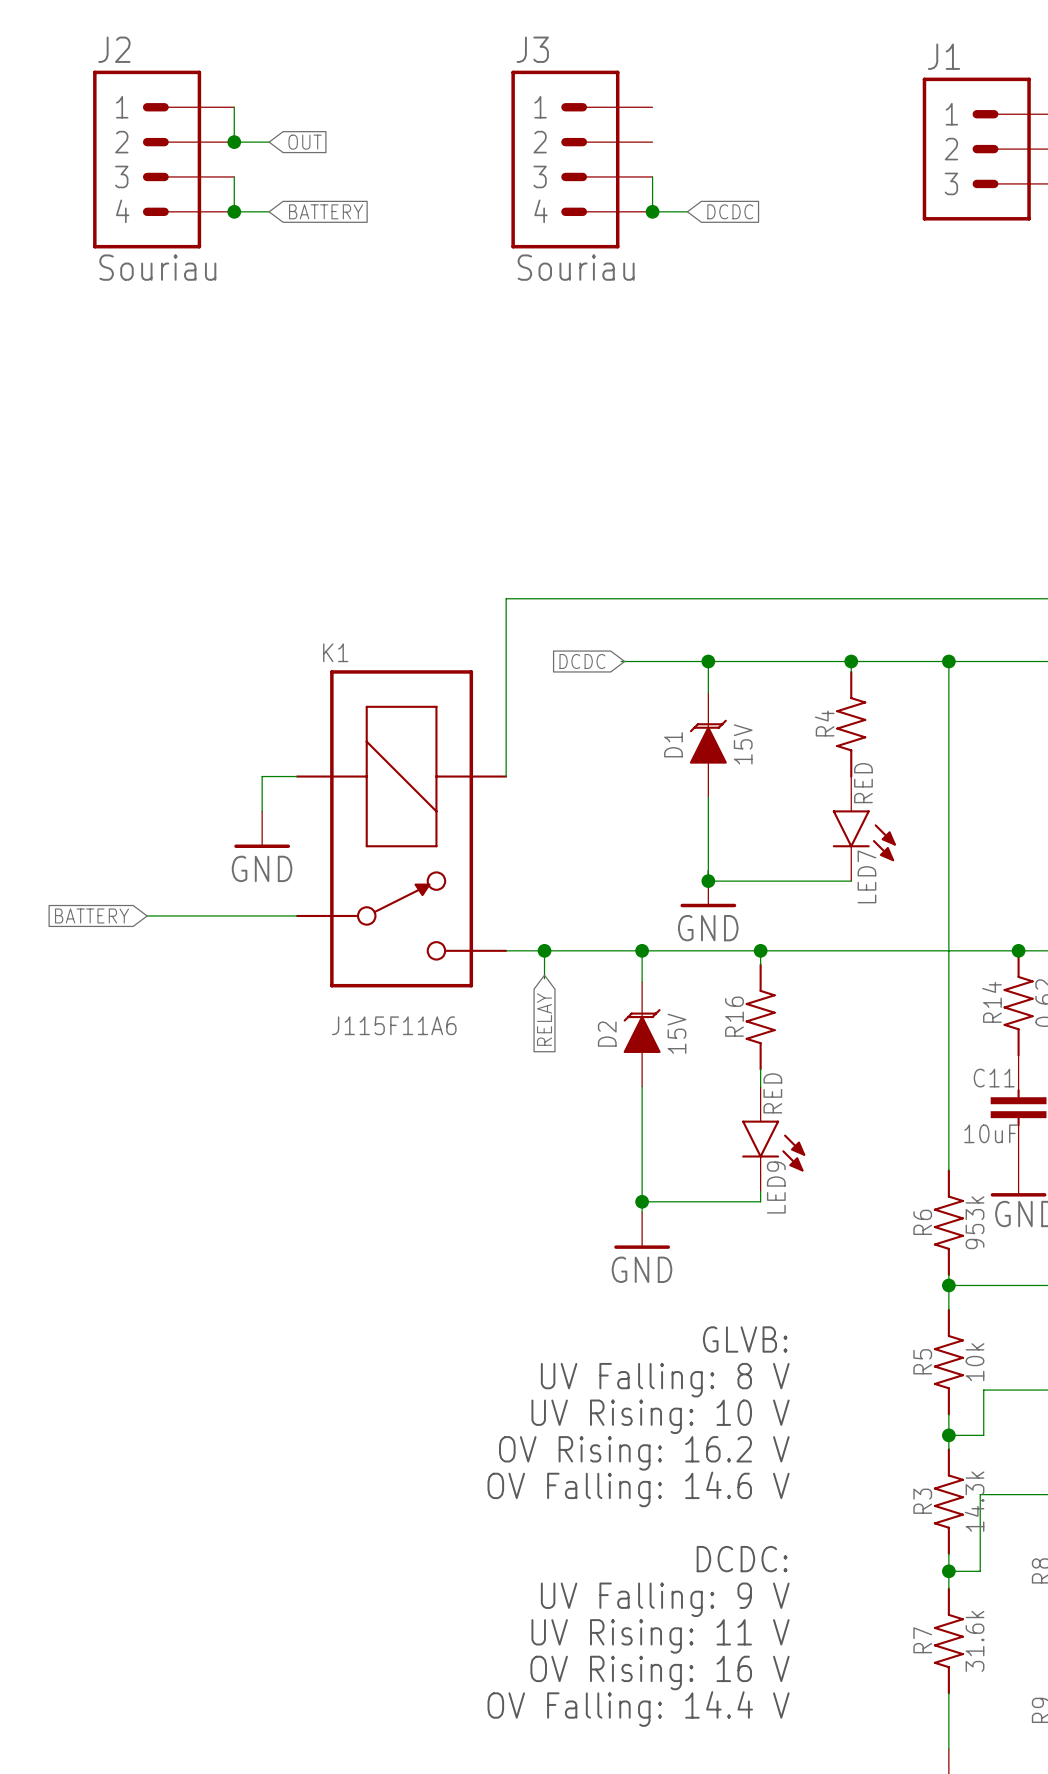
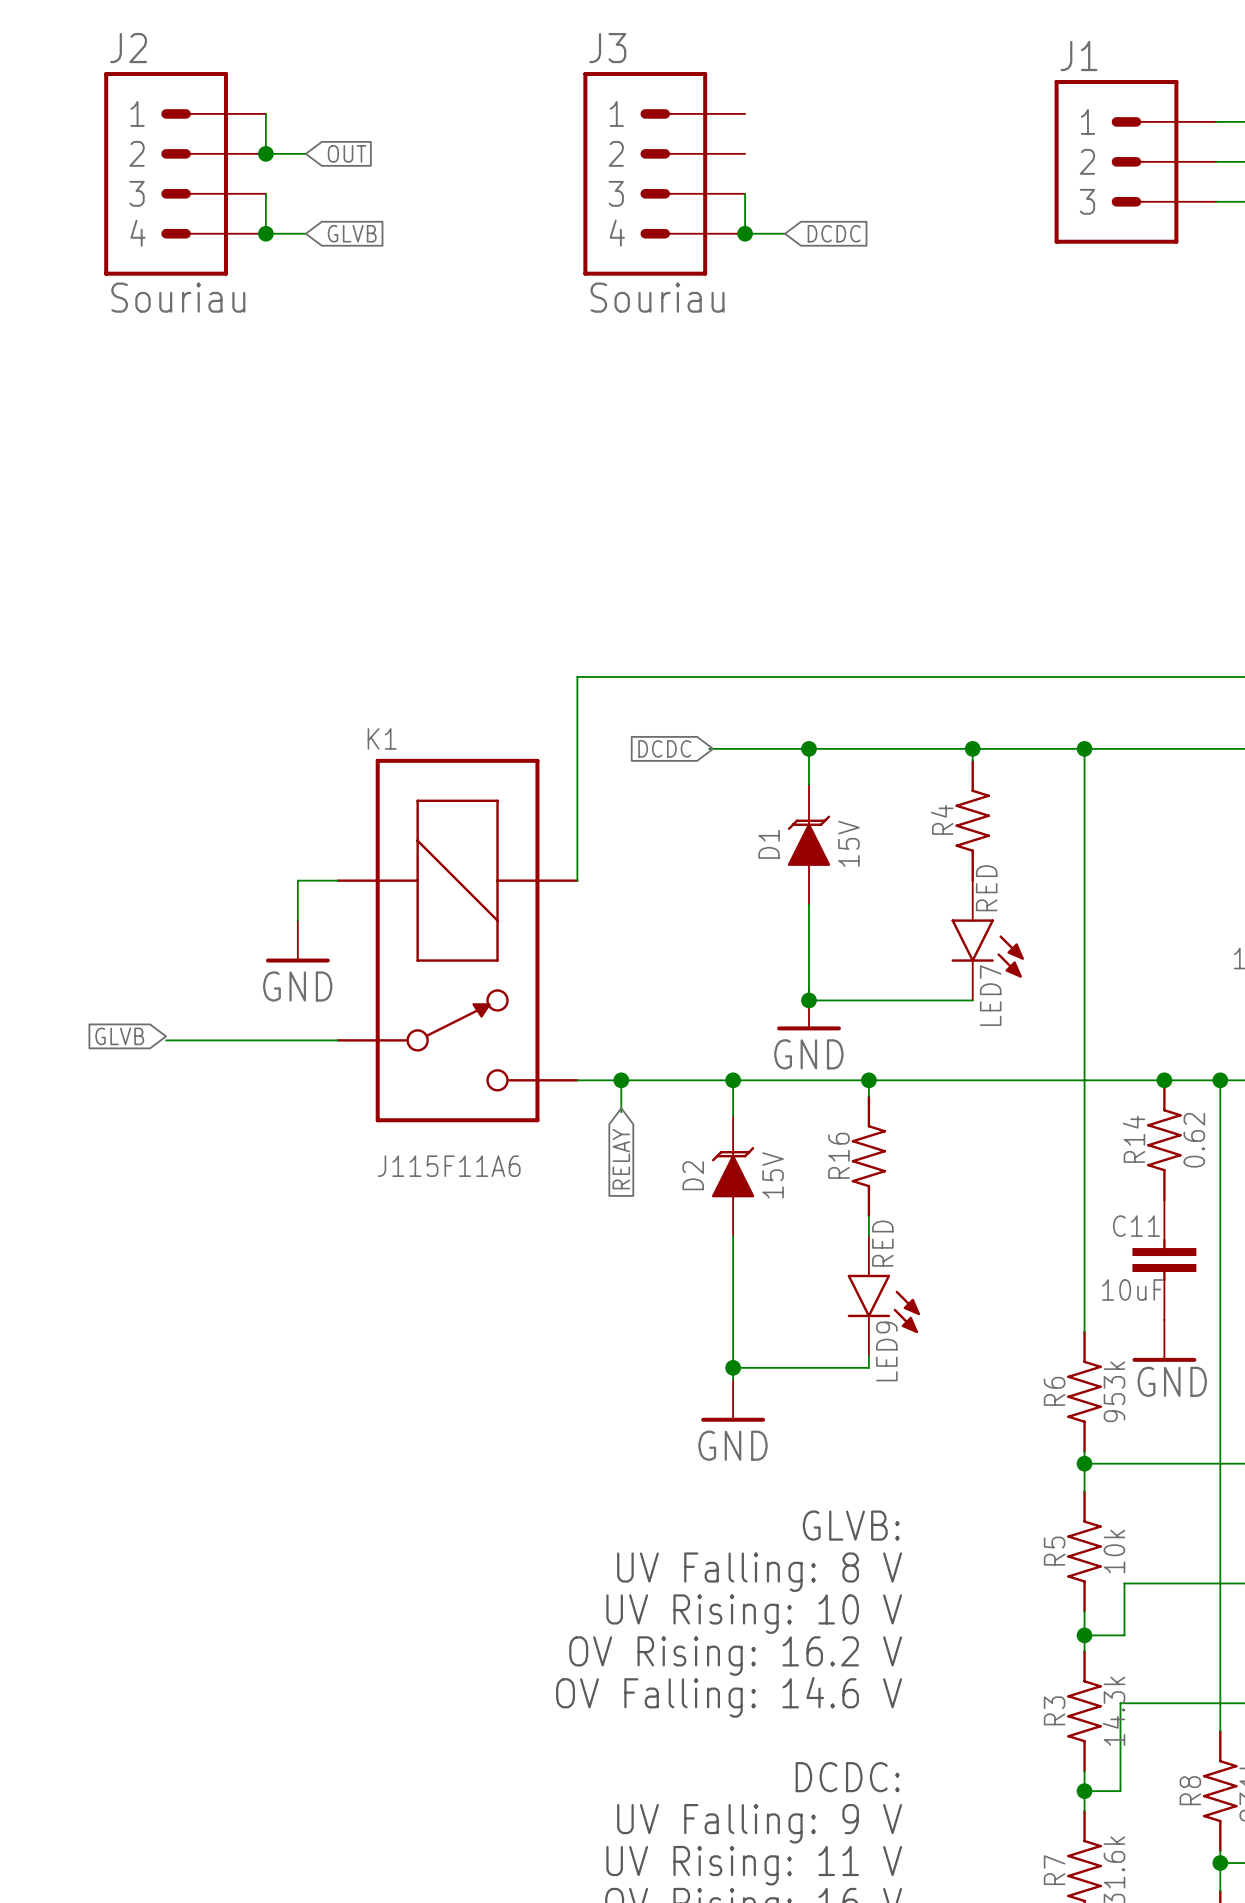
global label: BATTERY (326, 211) -> GLVB (352, 233)
global label: BATTERY (92, 915) -> GLVB (119, 1036)

